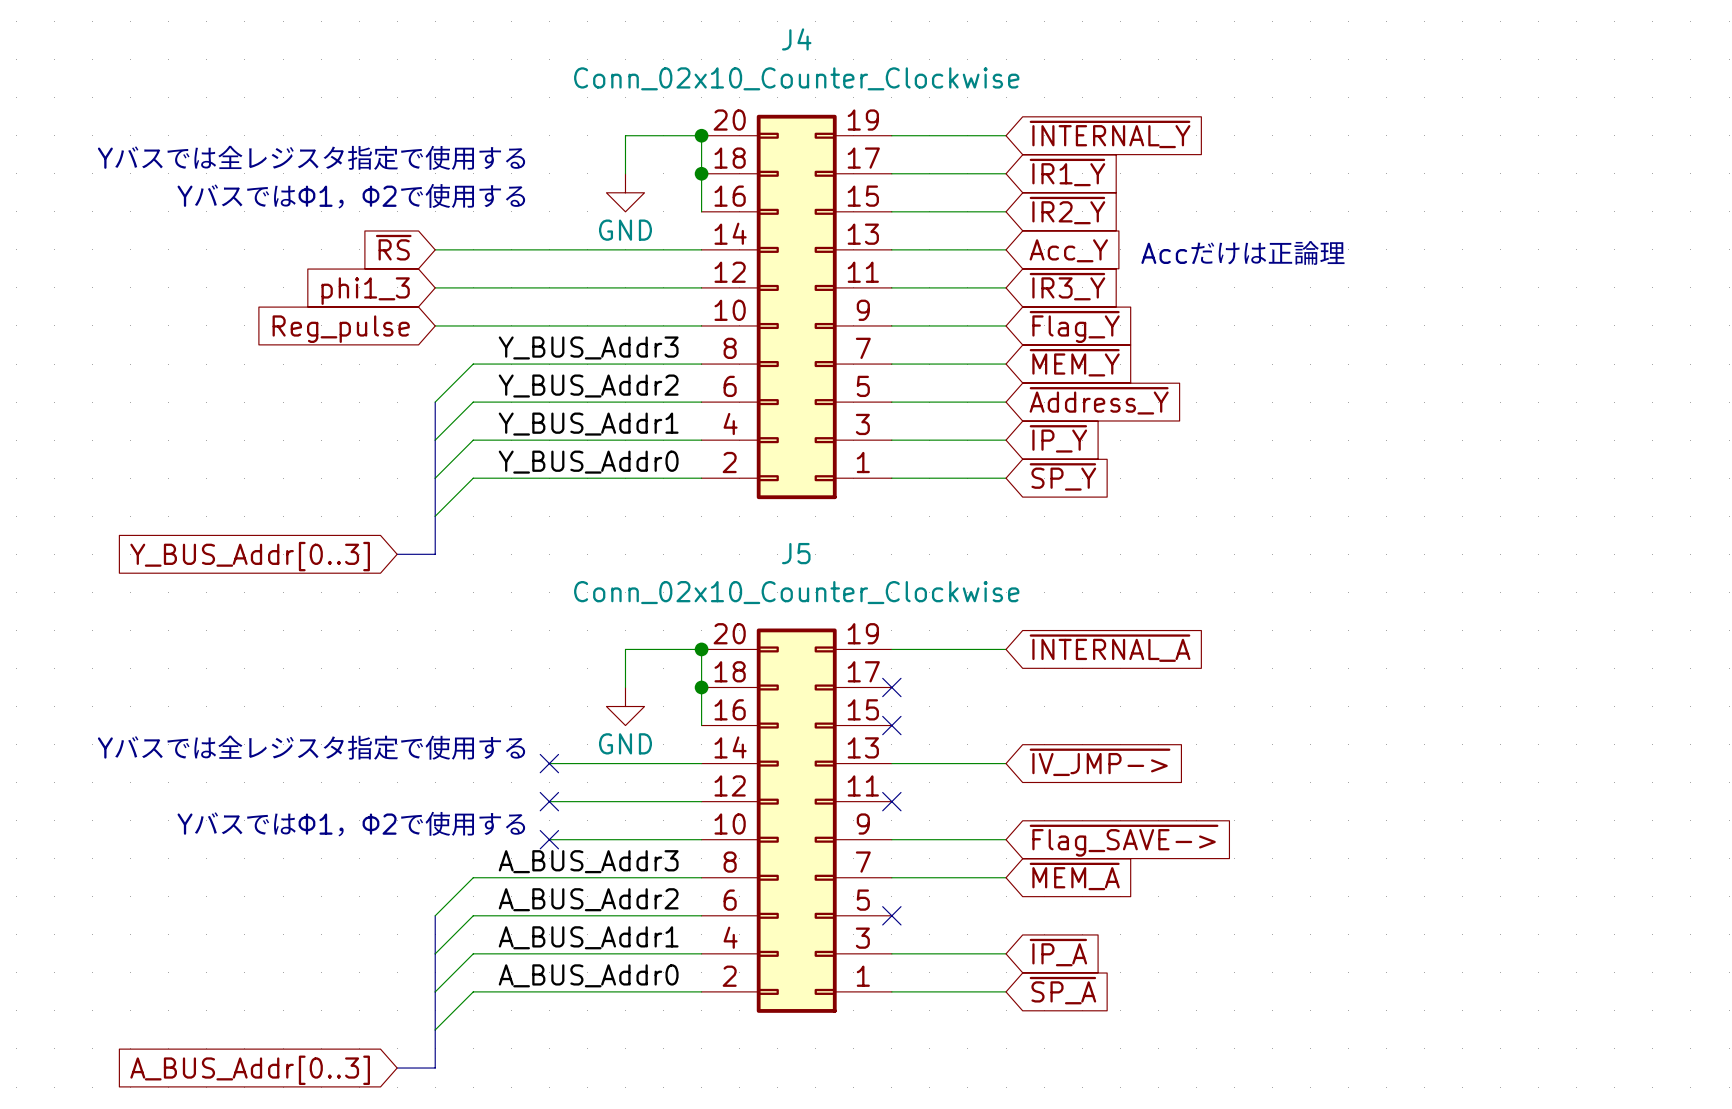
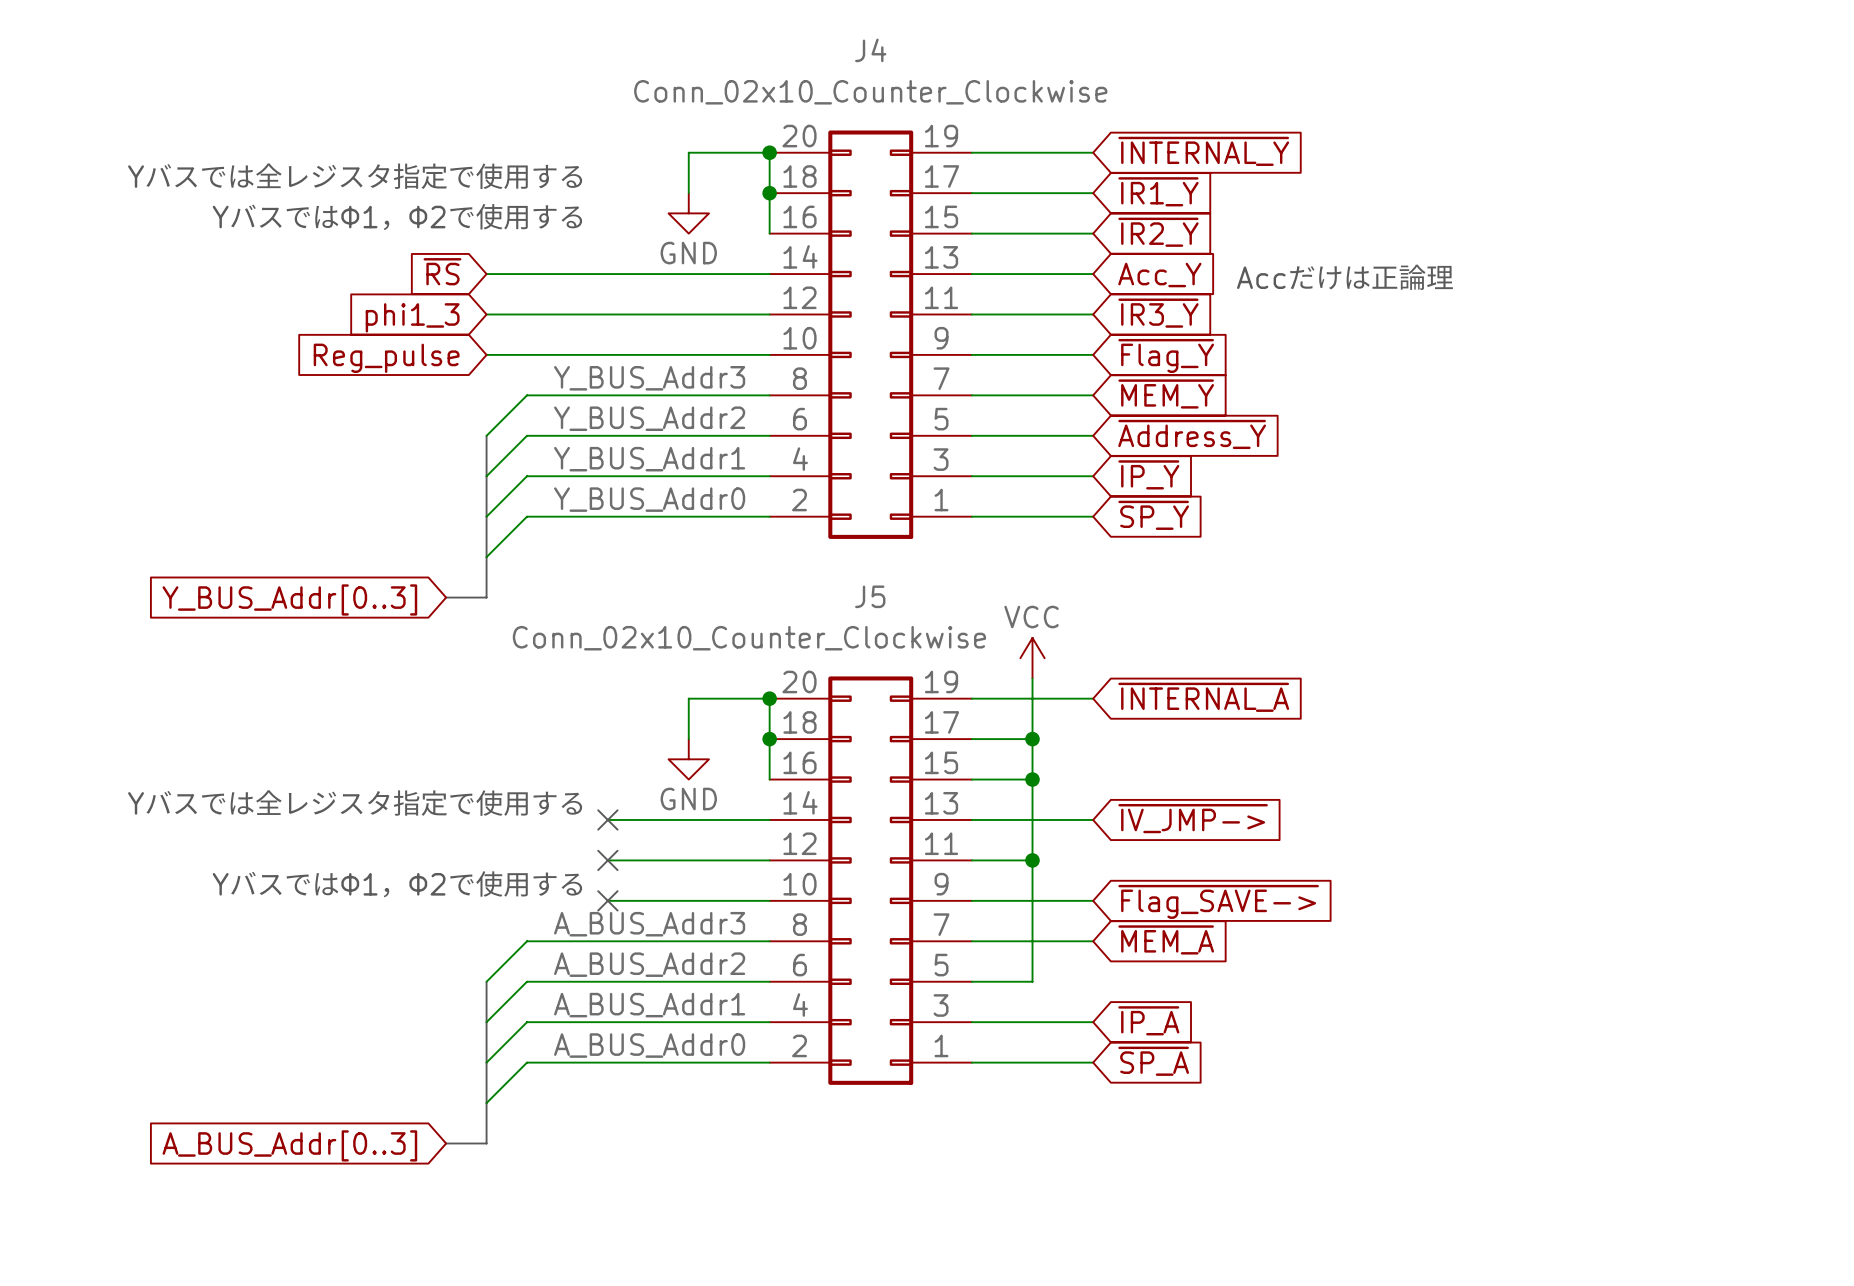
J5 value position: Conn_02x10_Counter_Clockwise (796, 592) -> Conn_02x10_Counter_Clockwise (749, 638)
power symbol: none -> VCC (1032, 658)
wire: none -> (1032, 678) (1032, 981) (971, 981)
wire: none -> (971, 739) (1032, 739)
no-connect mark: (891, 687) -> none
junction: none -> (1032, 739)
wire: none -> (971, 779) (1032, 779)
no-connect mark: (891, 725) -> none
junction: none -> (1032, 779)
wire: none -> (971, 860) (1032, 860)
no-connect mark: (891, 801) -> none
junction: none -> (1032, 860)
no-connect mark: (891, 915) -> none

